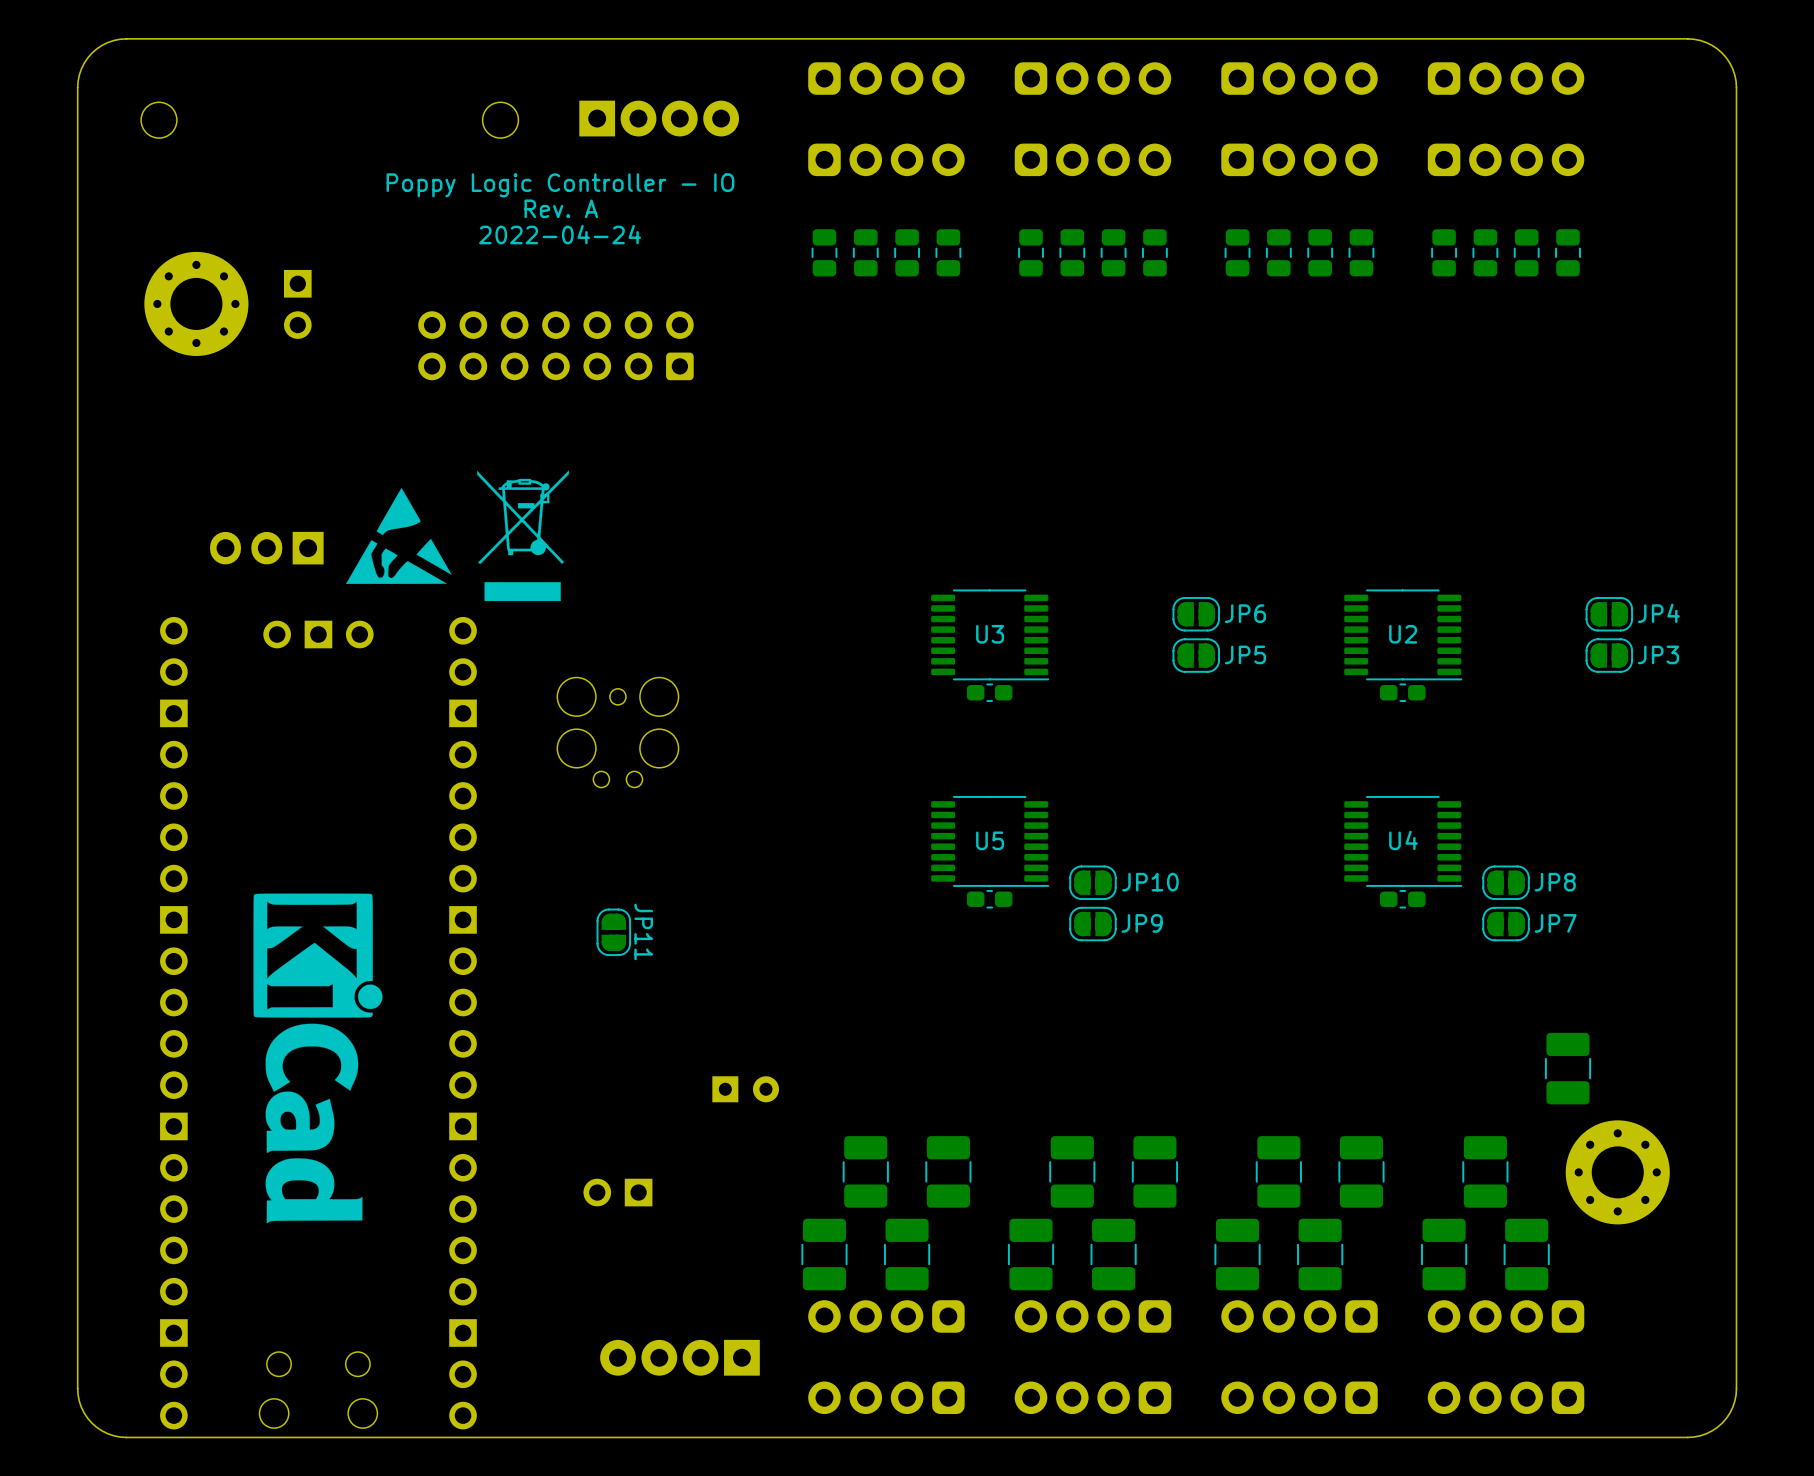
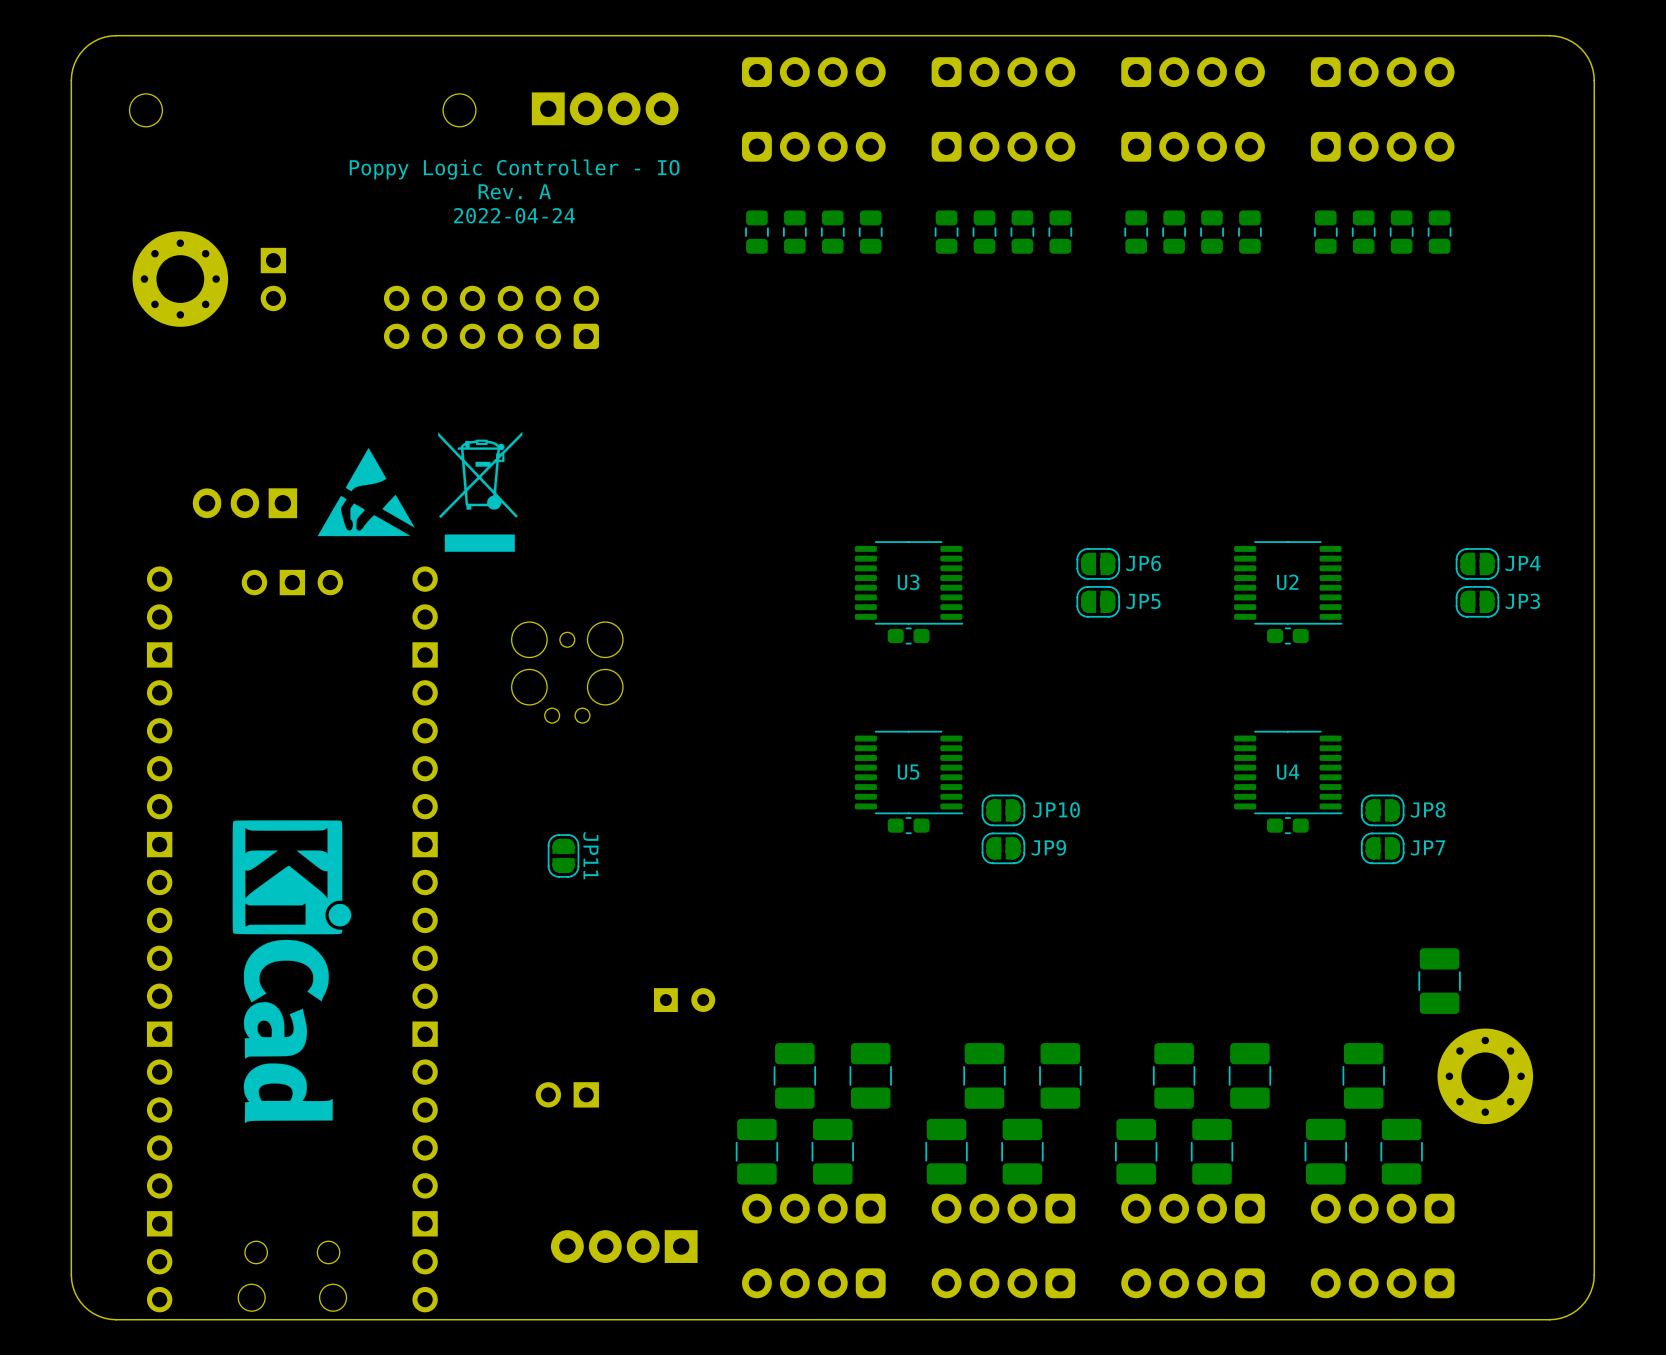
part: none -> (491, 317)
part: (555, 345) -> none

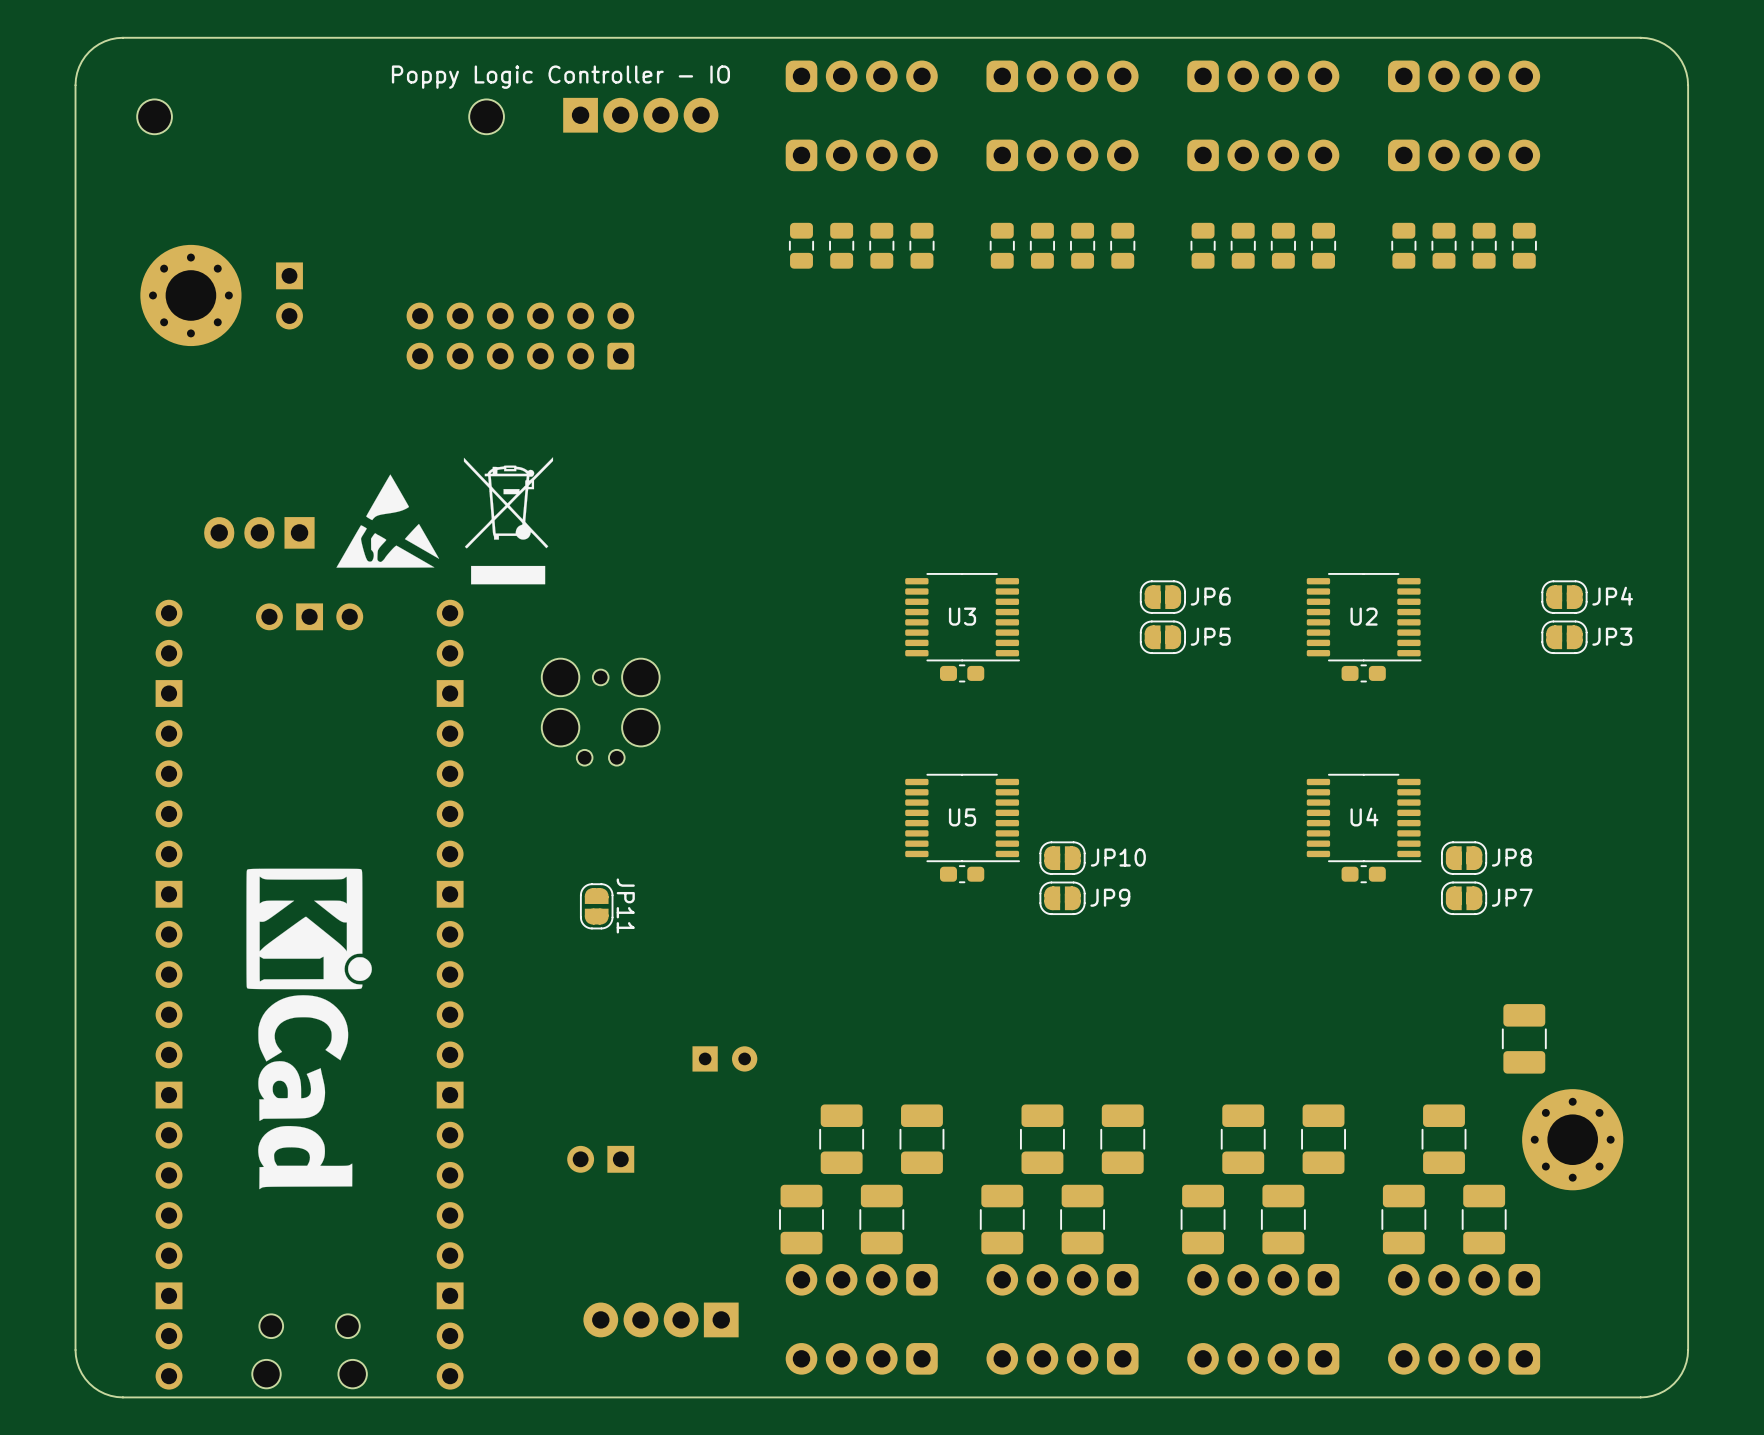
text position: Poppy Logic Controller - IO (514, 169) -> Poppy Logic Controller - IO (560, 77)
text: Rev. A (514, 191) -> none
text: 2022-04-24 (514, 215) -> none

